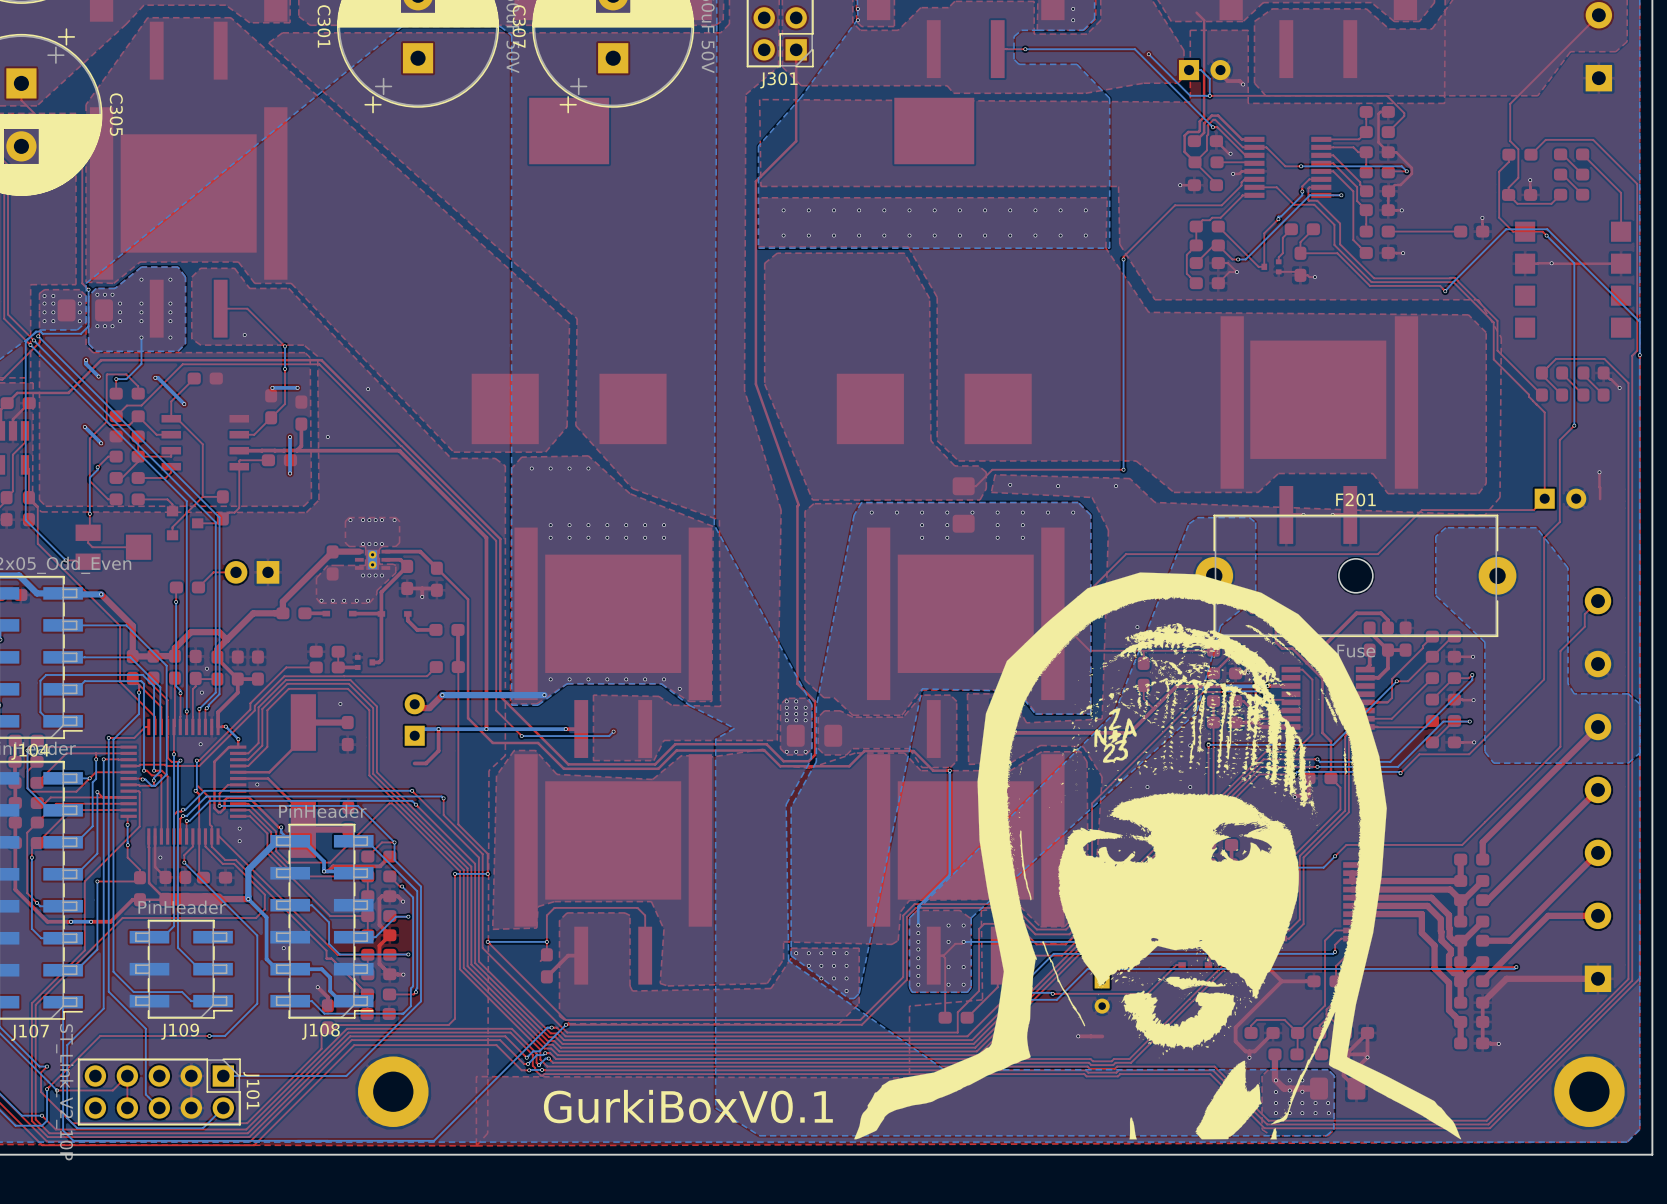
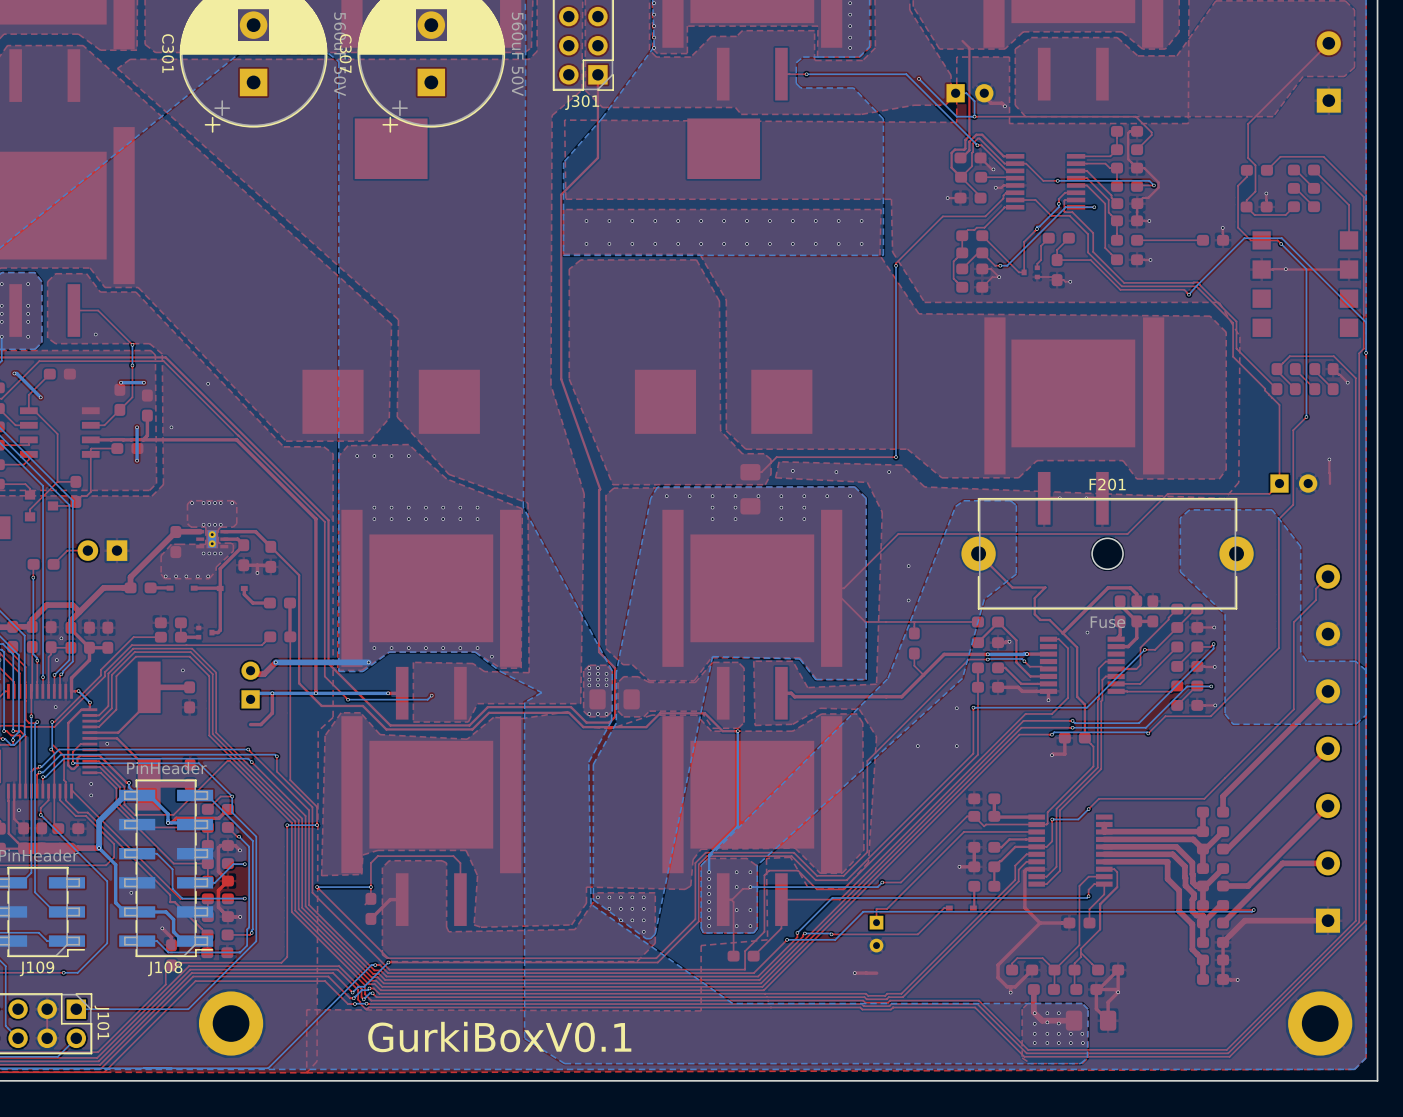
drawing: [854, 572, 1462, 1140] -> none

